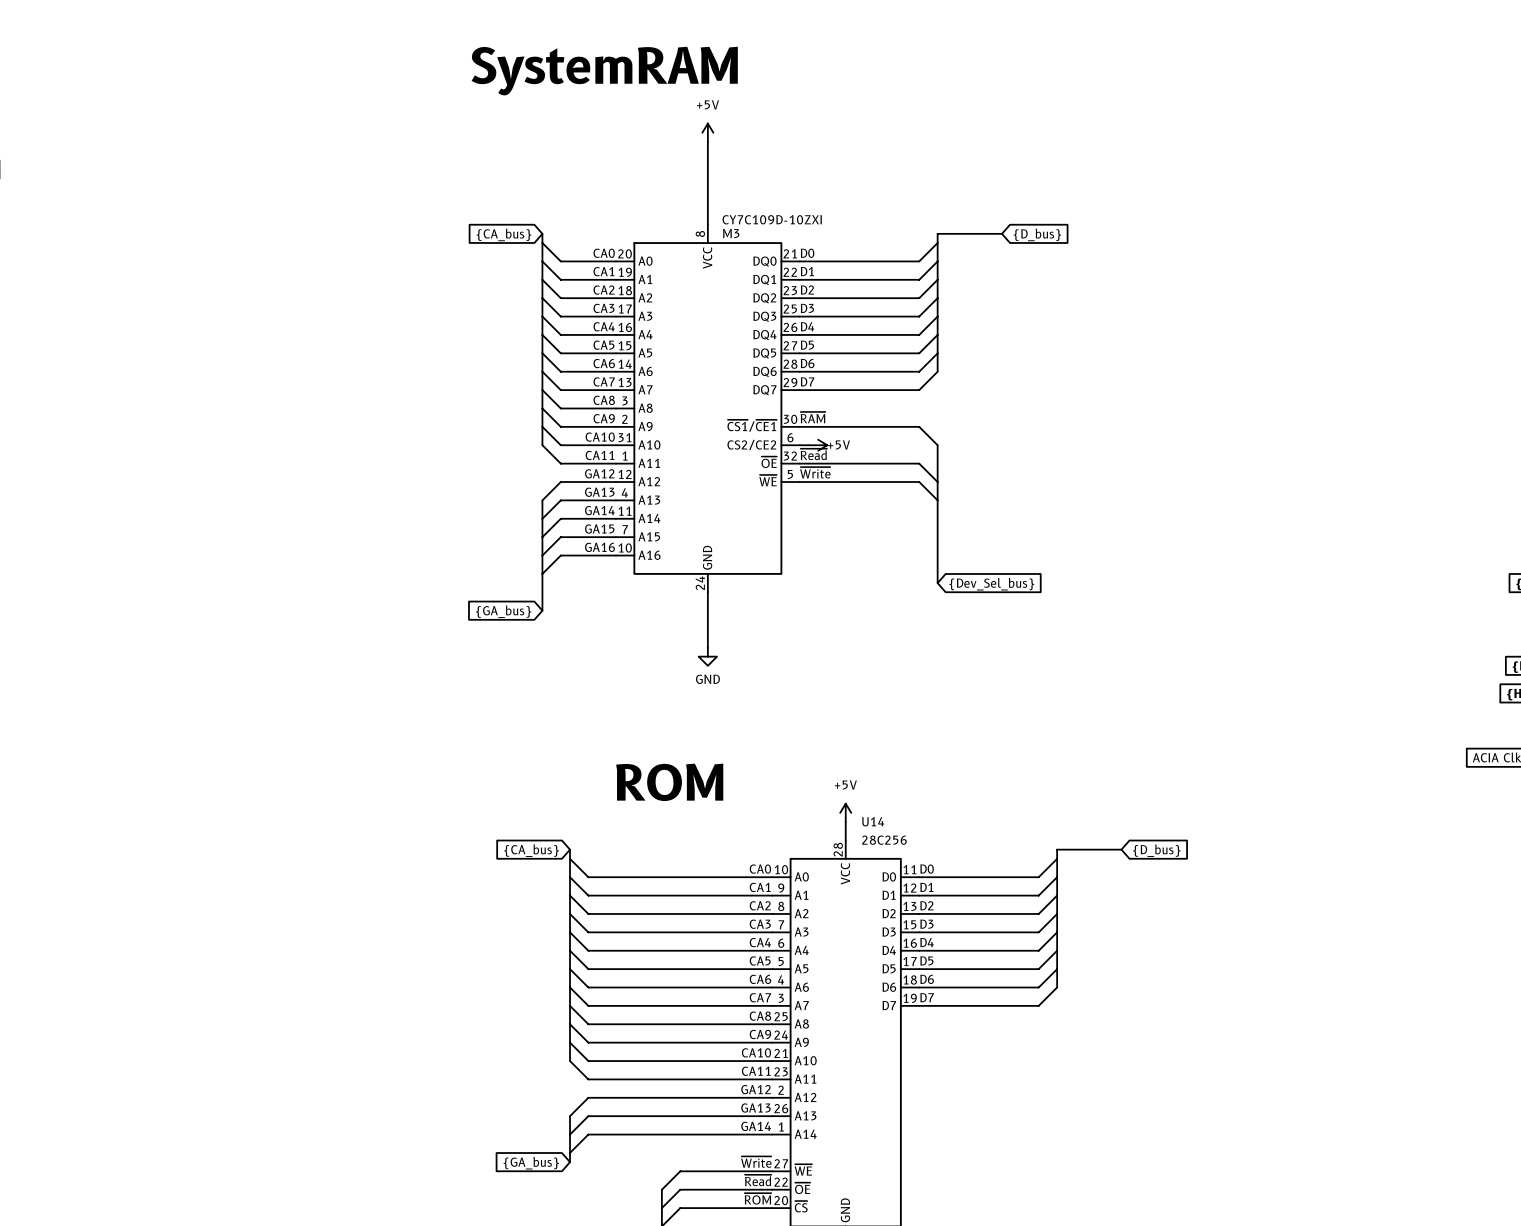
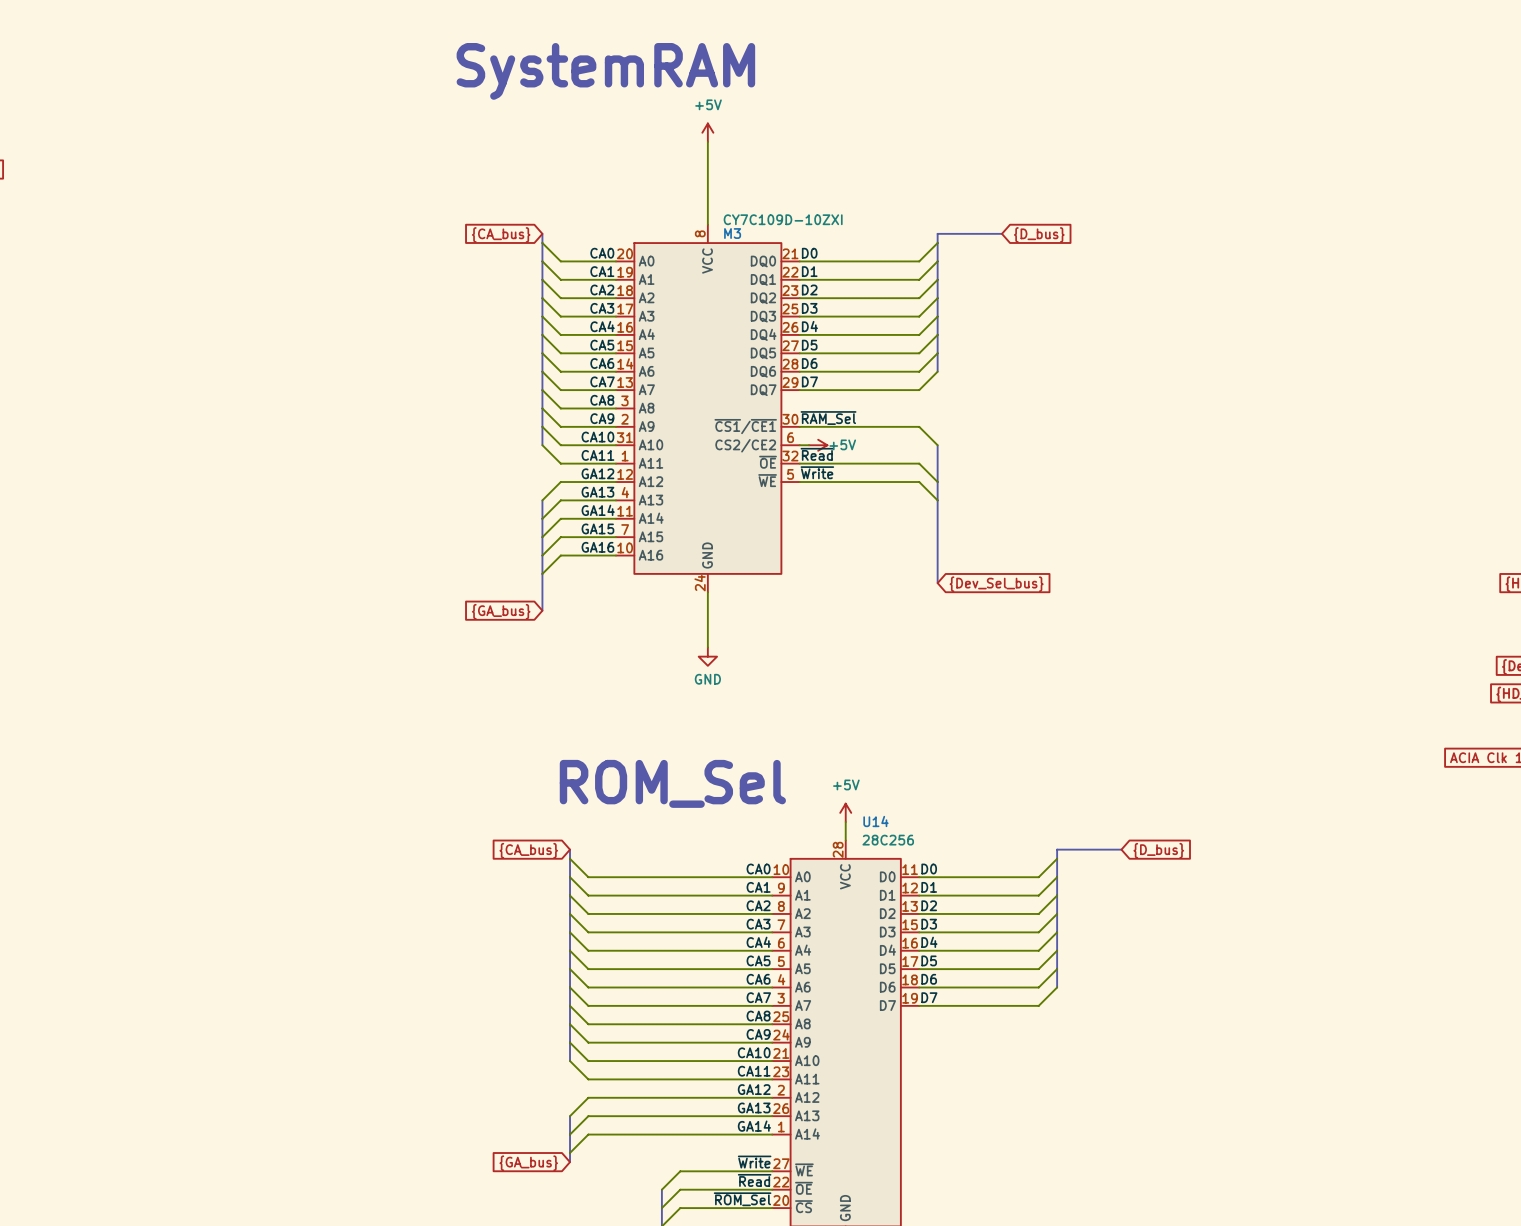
label: ~{RAM} (813, 417) -> ~{RAM_Sel} (828, 418)
text: ROM (669, 782) -> ROM_Sel (672, 783)
label: ~{ROM} (758, 1198) -> ~{ROM_Sel} (742, 1199)

